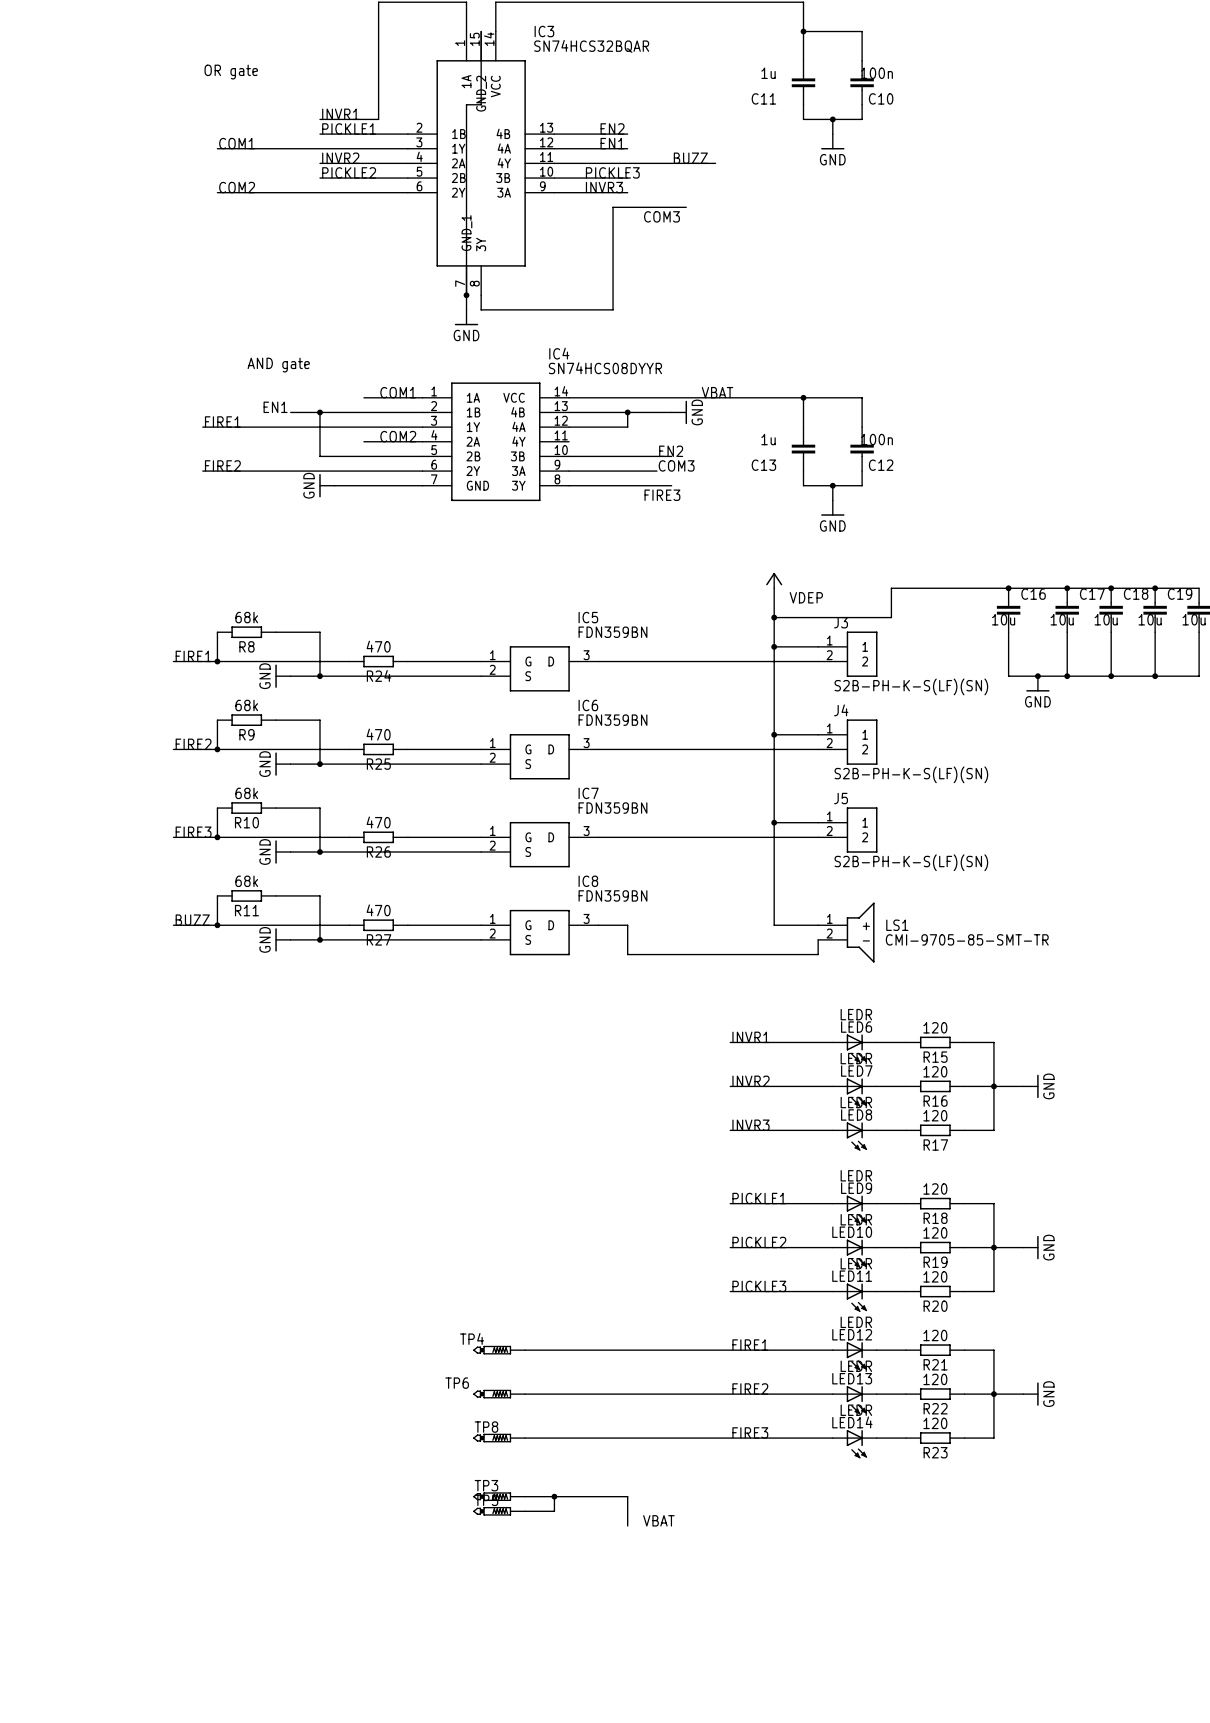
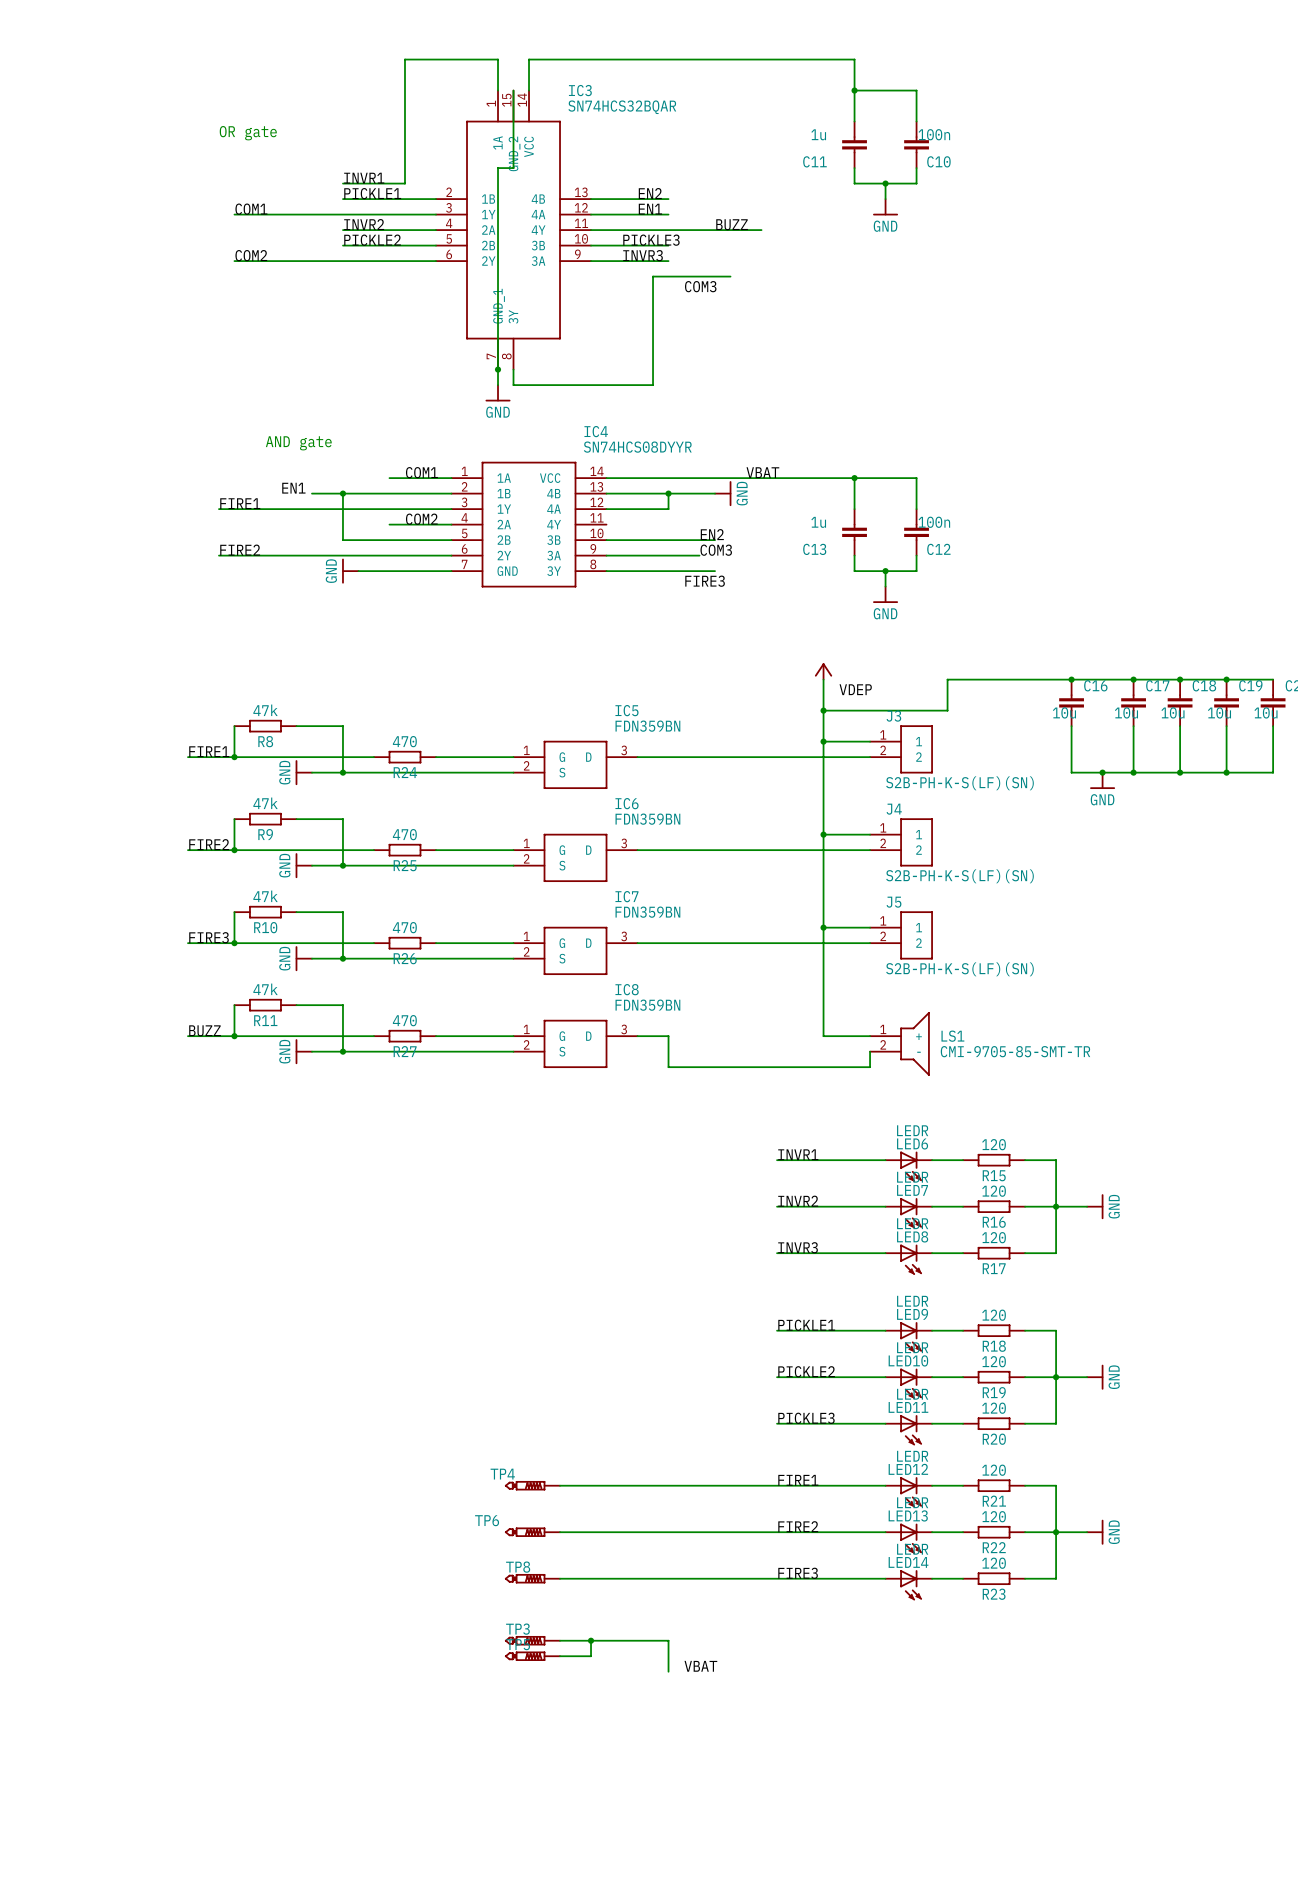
R8 value: 68k (246, 617) -> 47k (265, 710)
R9 value: 68k (246, 705) -> 47k (265, 803)
R10 value: 68k (246, 793) -> 47k (265, 896)
R11 value: 68k (246, 881) -> 47k (265, 989)

